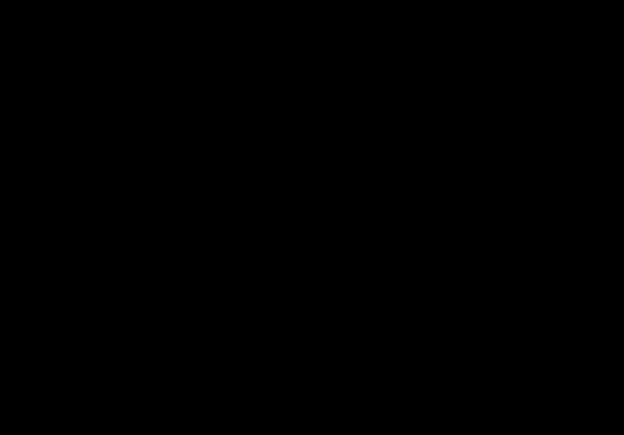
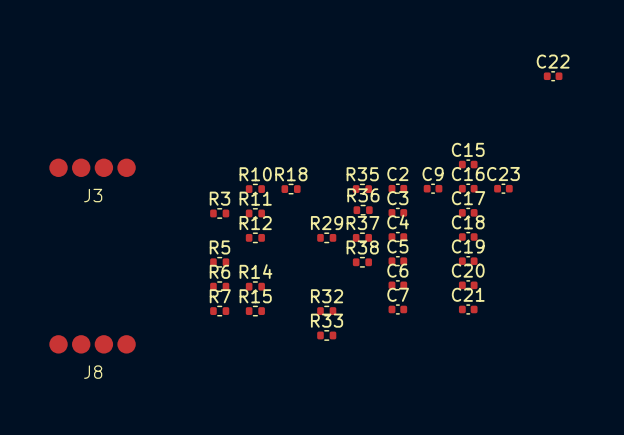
C22: none -> (553, 76)
C15: none -> (468, 164)
J3: none -> (92, 167)
C2: none -> (397, 188)
C9: none -> (433, 188)
C16: none -> (468, 188)
C23: none -> (503, 188)
R10: none -> (255, 189)
R18: none -> (291, 189)
R35: none -> (362, 189)
R36: none -> (363, 210)
C3: none -> (397, 212)
C17: none -> (468, 212)
R3: none -> (219, 213)
R11: none -> (255, 213)
R12: none -> (255, 237)
R29: none -> (326, 237)
R37: none -> (362, 237)
C4: none -> (397, 237)
C18: none -> (468, 237)
C5: none -> (397, 261)
C19: none -> (468, 261)
R5: none -> (219, 262)
R38: none -> (362, 262)
C6: none -> (397, 285)
C20: none -> (468, 285)
R6: none -> (219, 286)
R14: none -> (255, 286)
C7: none -> (397, 309)
C21: none -> (468, 309)
R7: none -> (219, 311)
R15: none -> (255, 311)
R32: none -> (326, 311)
R33: none -> (326, 335)
J8: none -> (92, 344)

